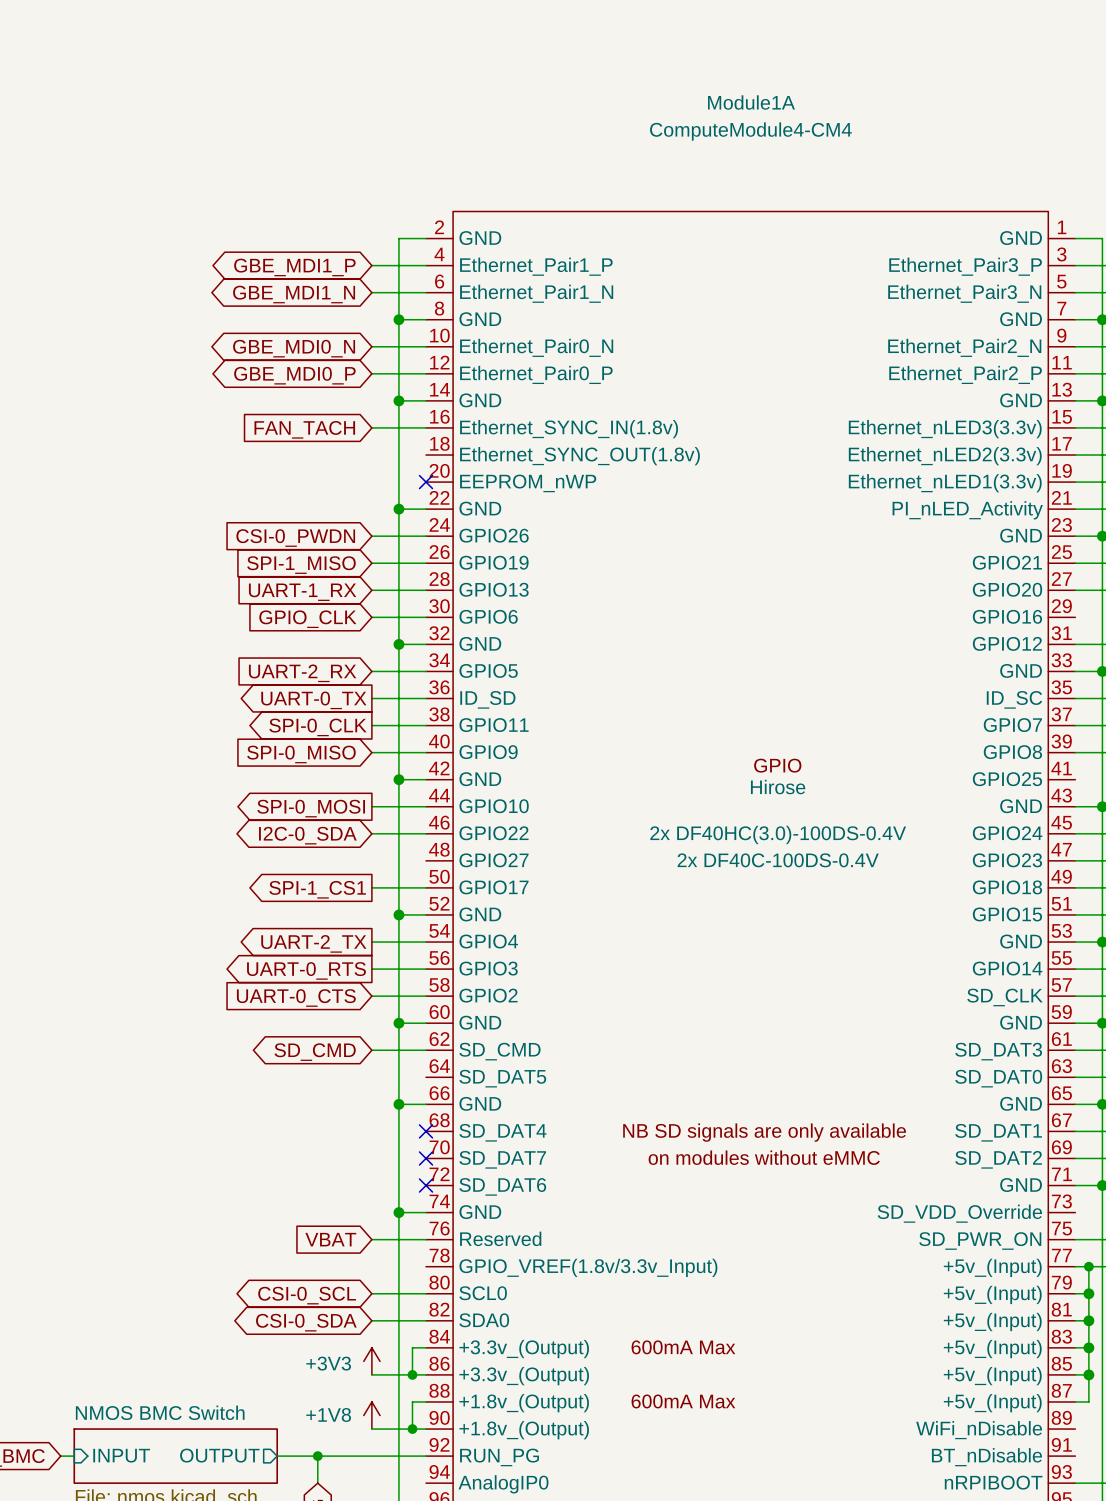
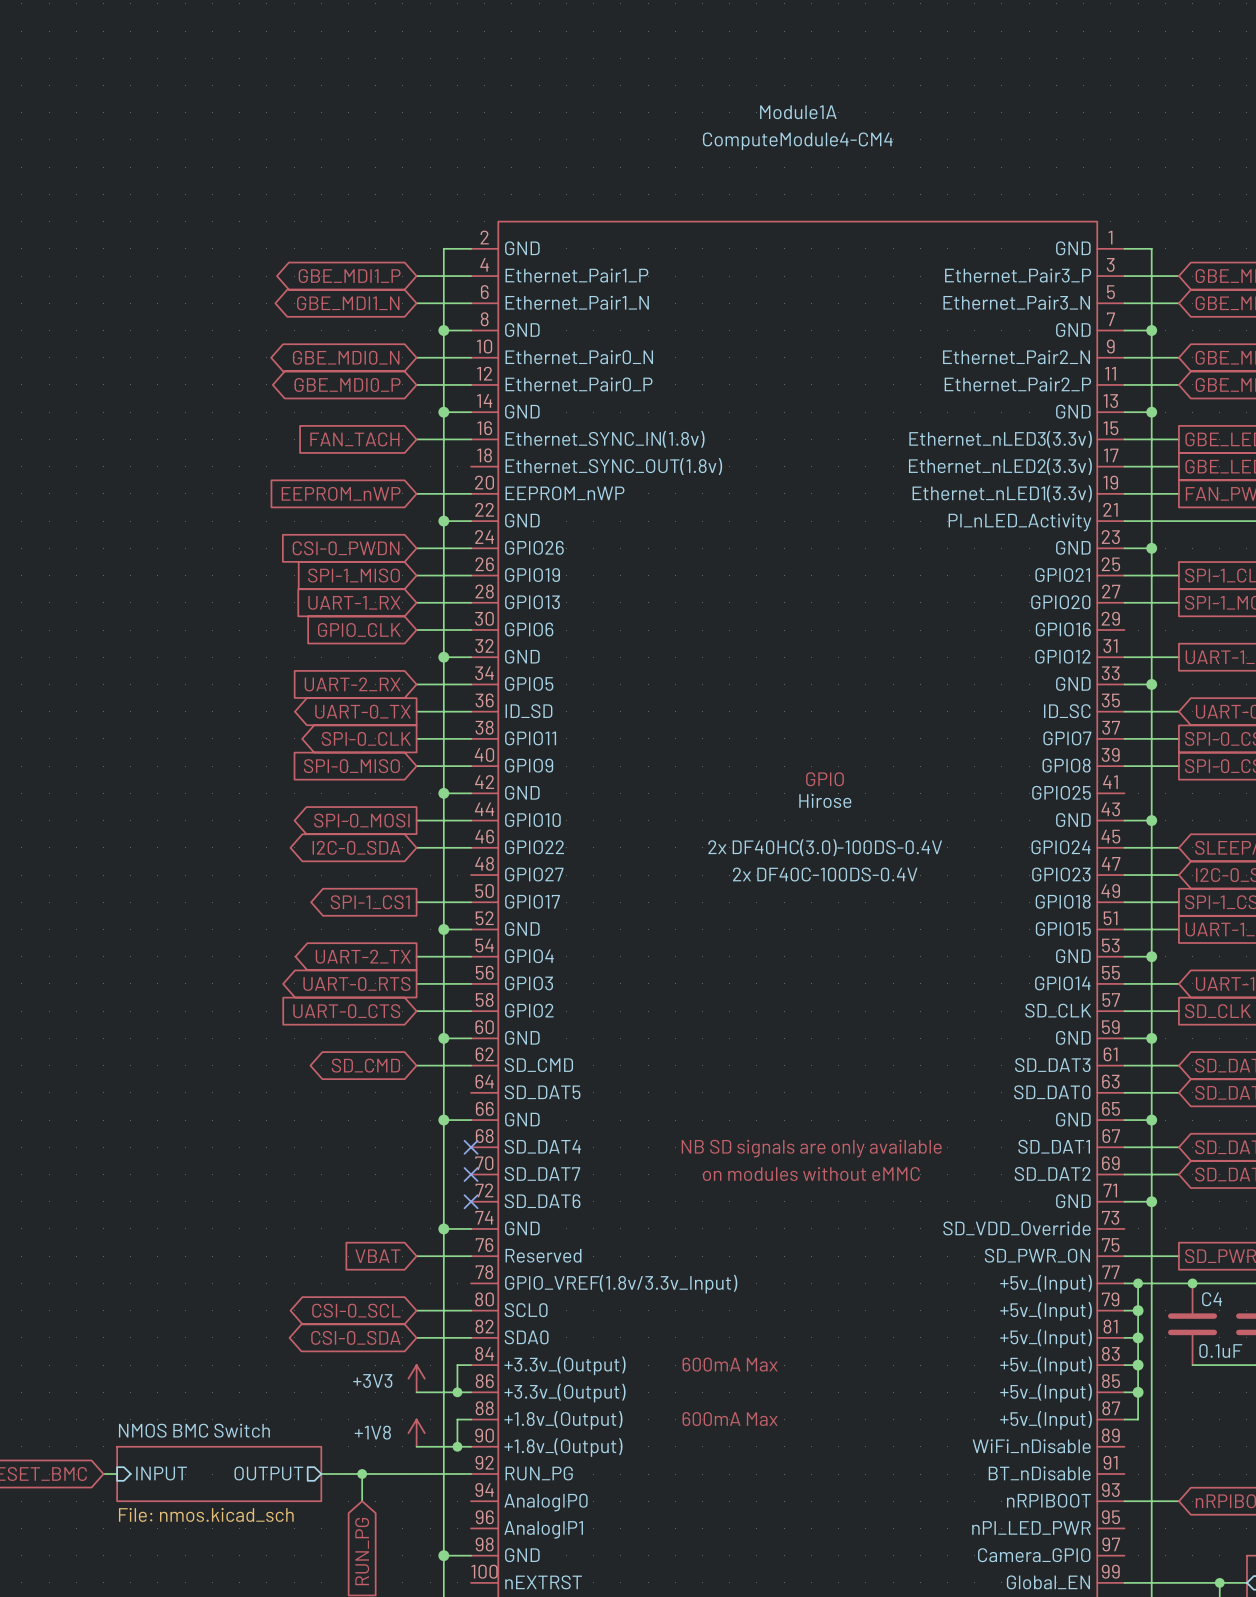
wire: none -> (416, 493) (471, 493)
no-connect mark: (426, 482) -> none
global label: none -> EEPROM_nWP (341, 493)

